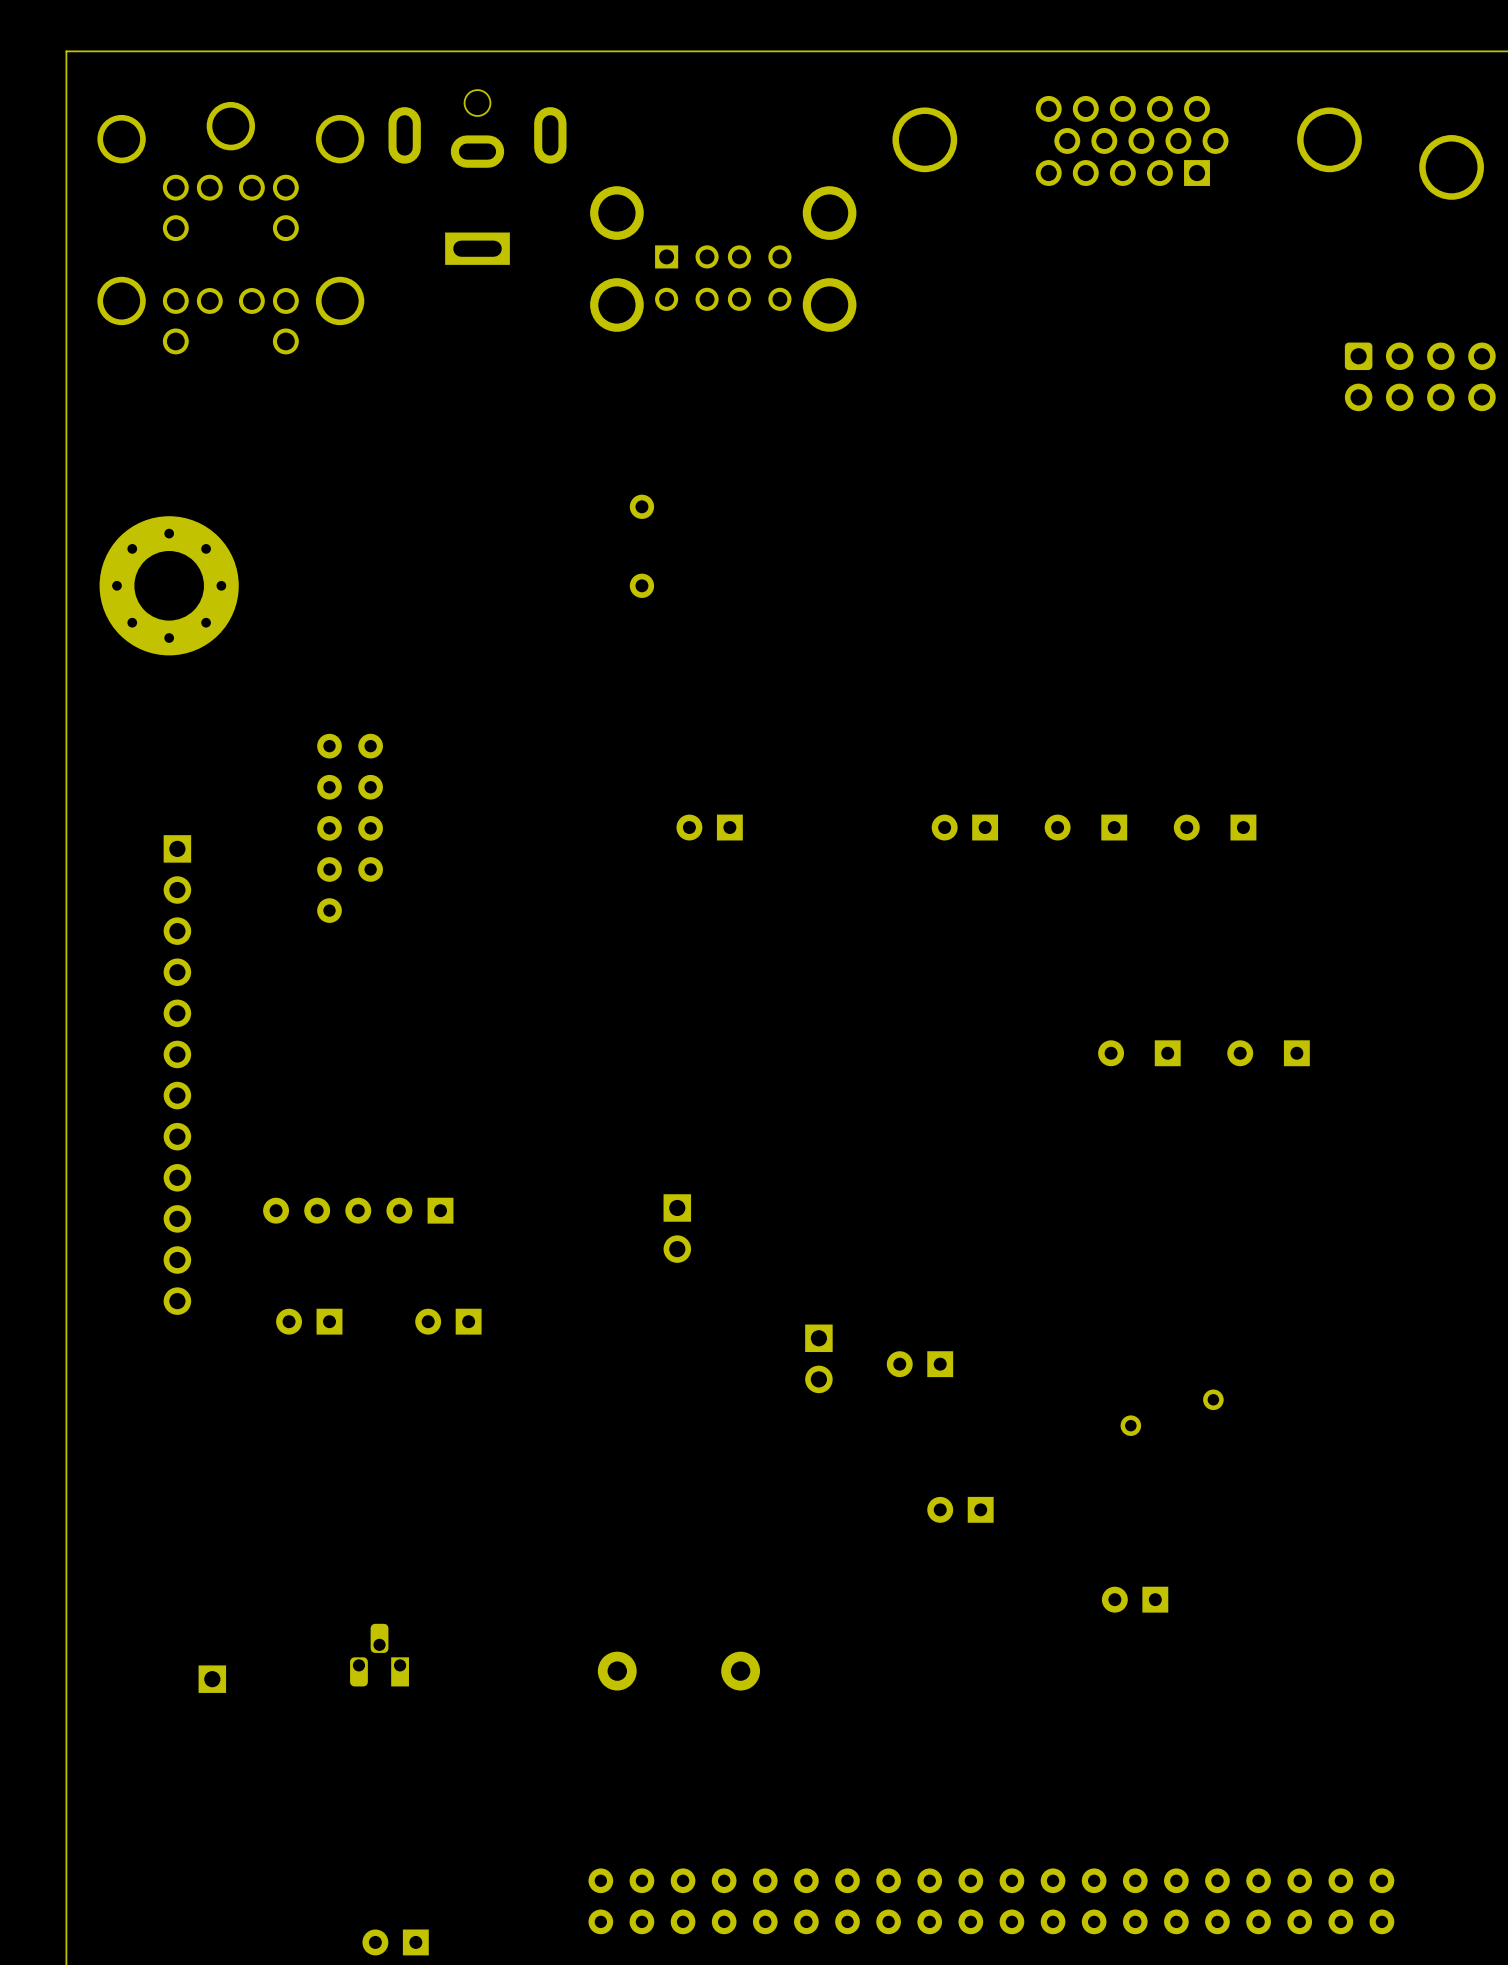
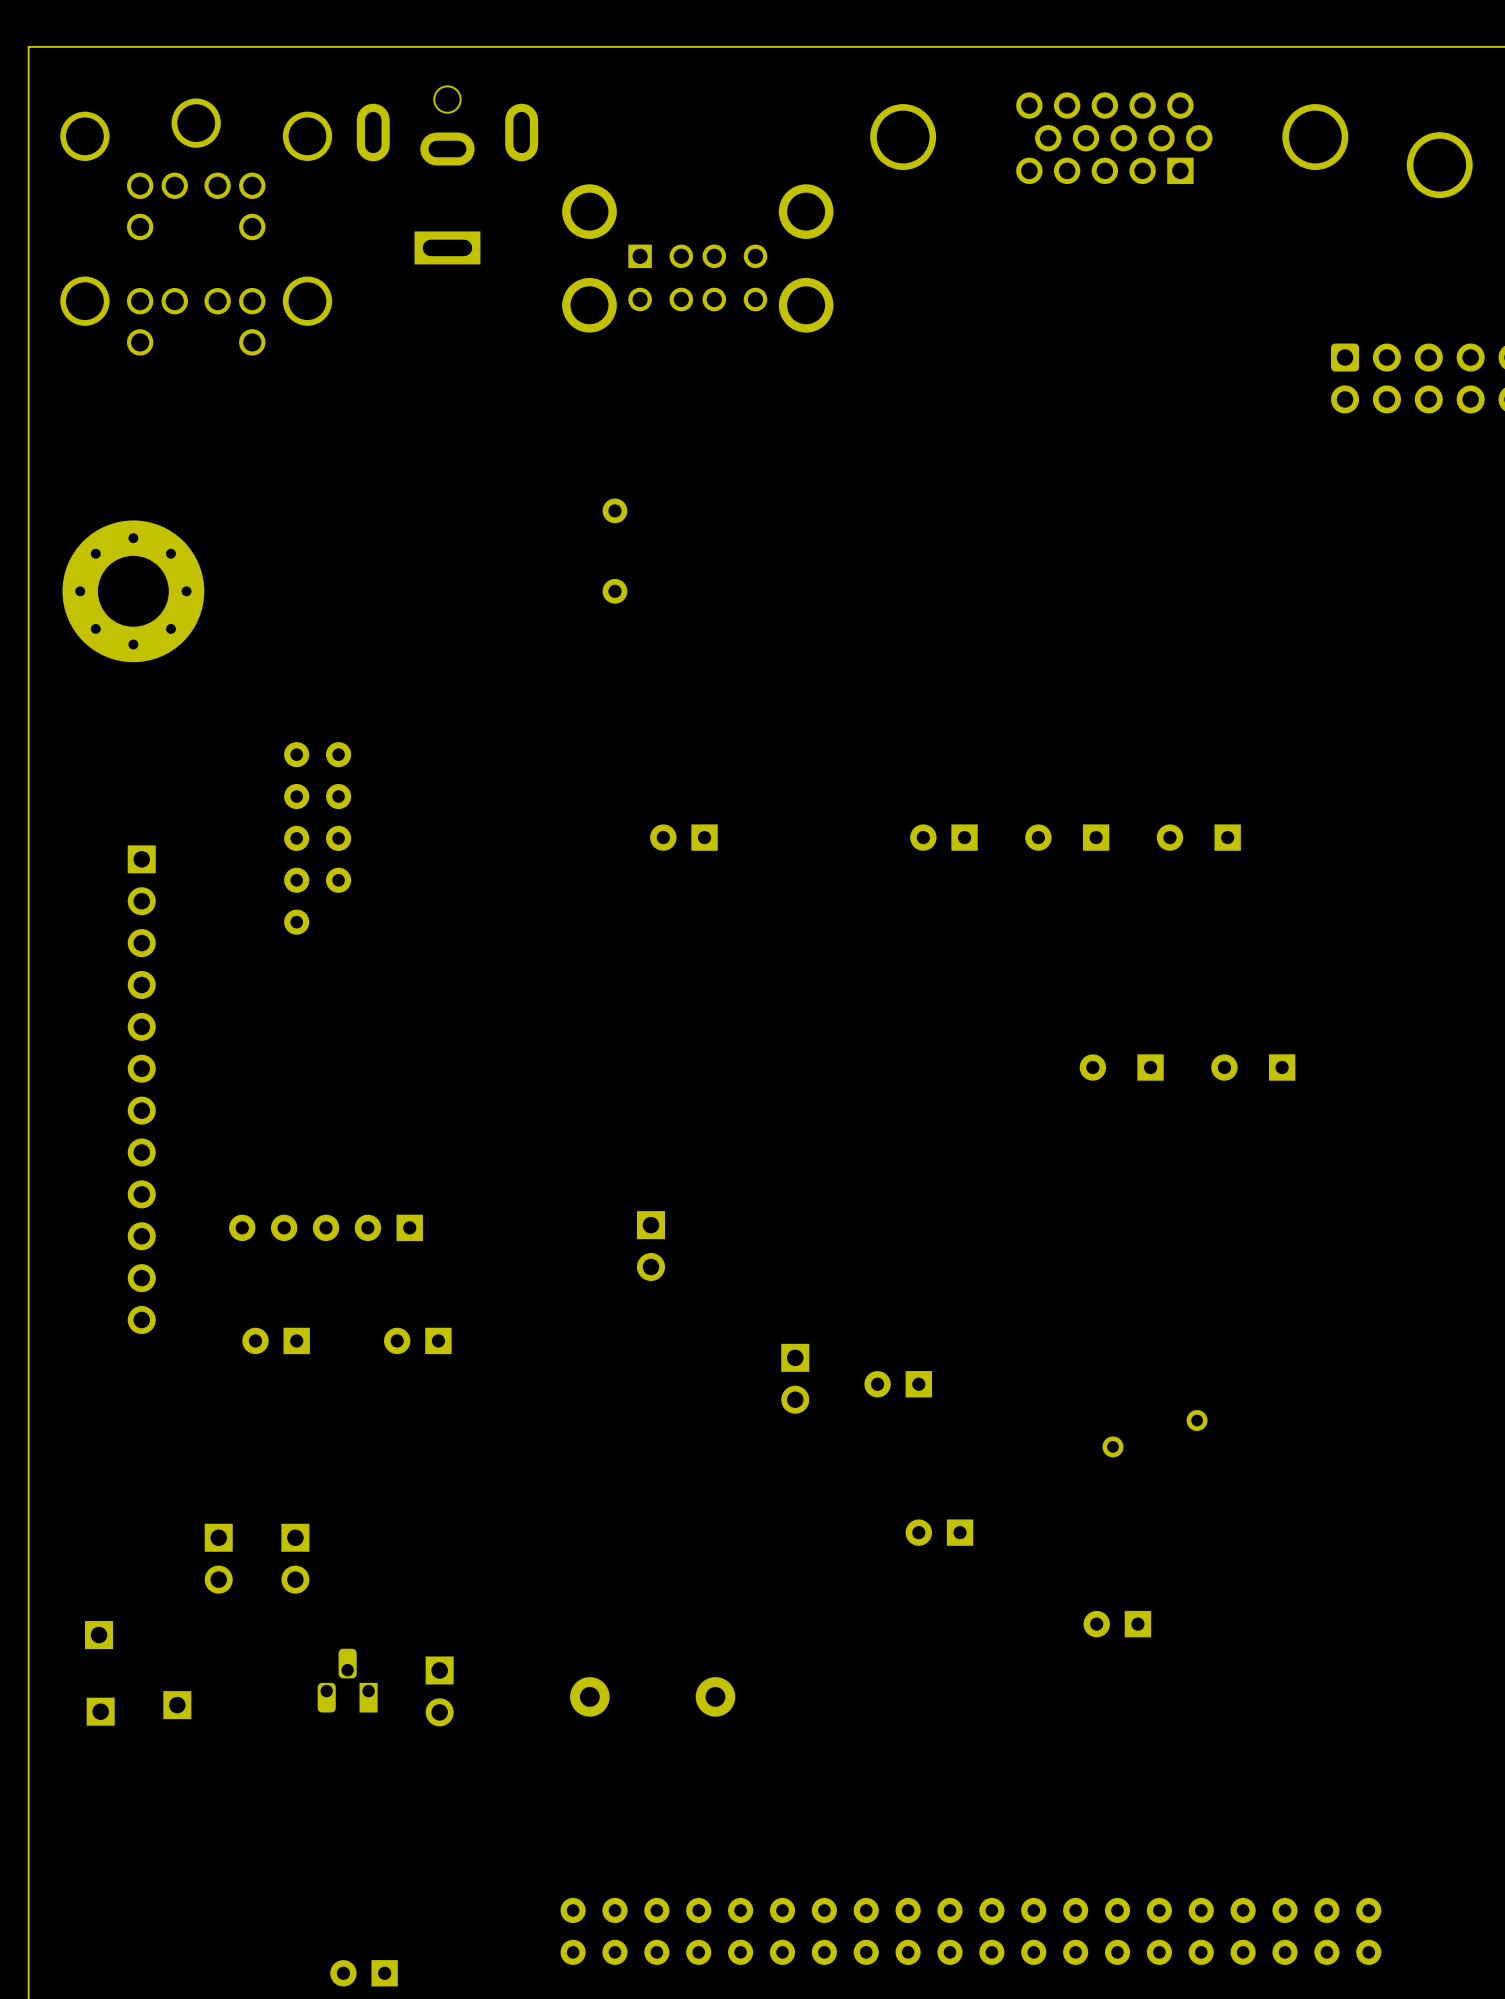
part: none -> (218, 1558)
part: none -> (295, 1558)
part: none -> (99, 1635)
part: none -> (439, 1691)
part: none -> (100, 1711)

